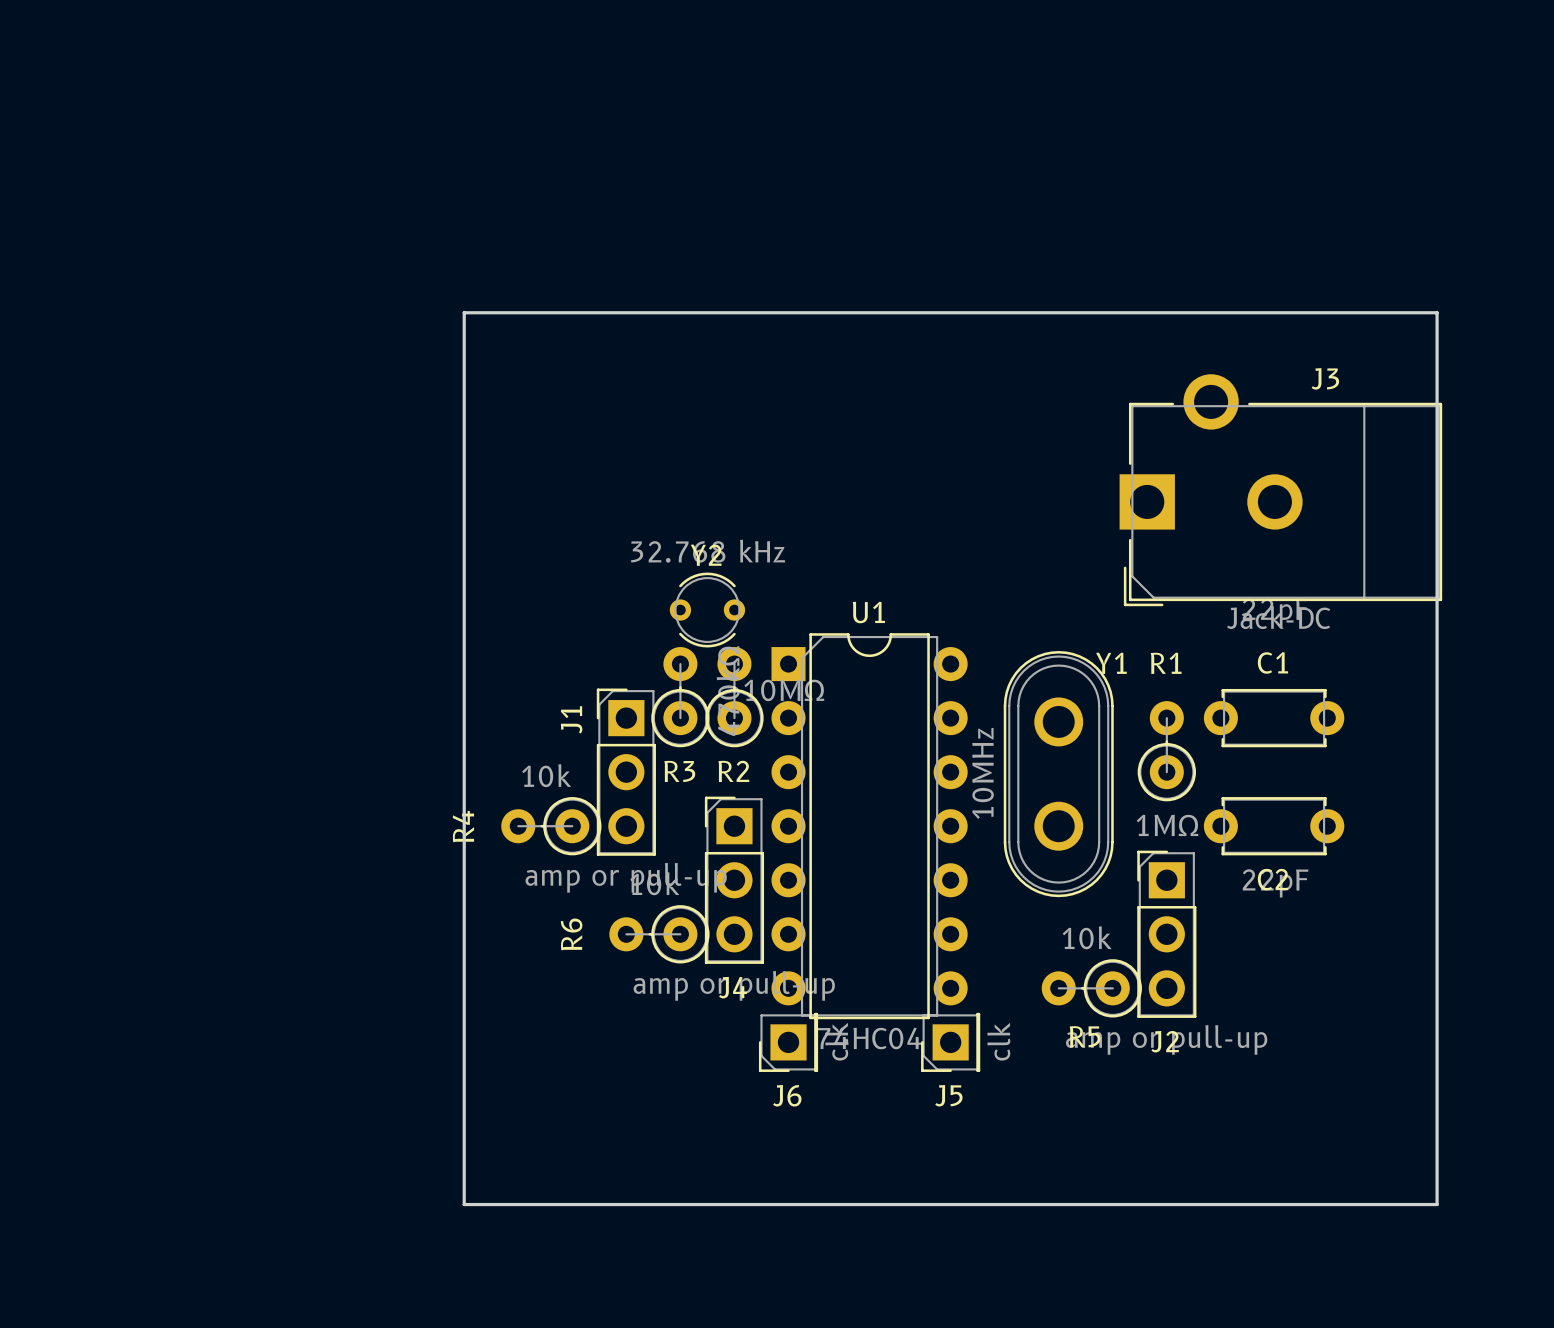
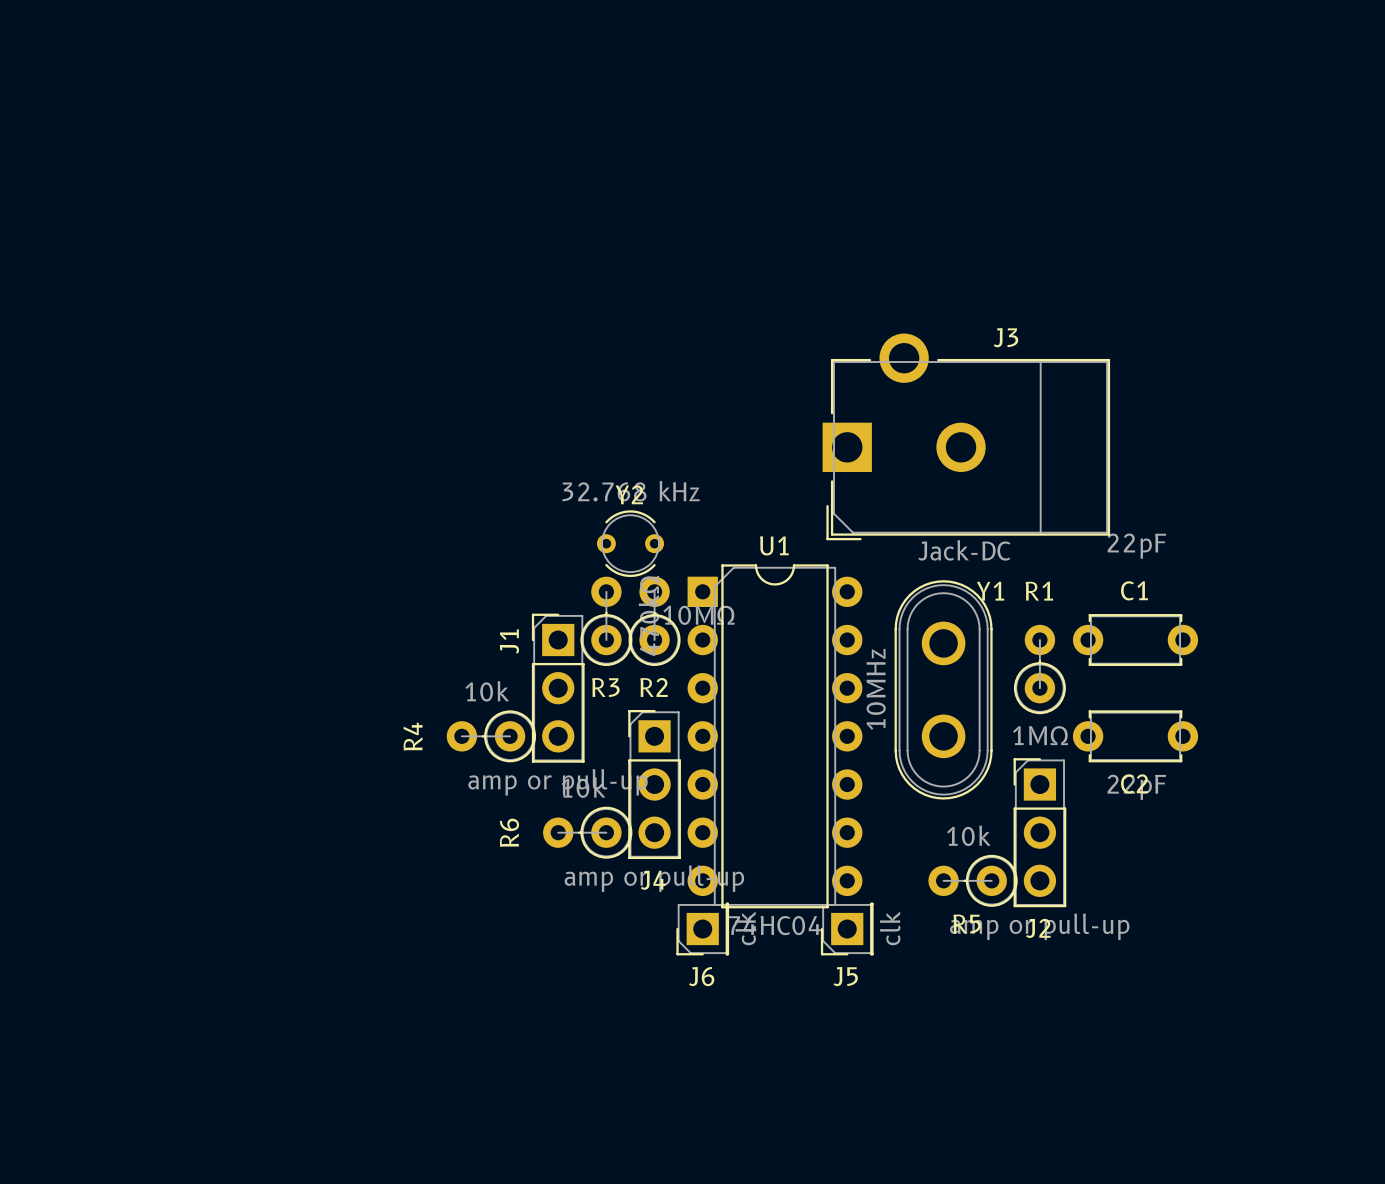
board edge: (464, 312) (464, 1204) (1437, 1204) (1437, 312) (464, 312) -> none
J3 position: (1280, 490) -> (966, 436)

